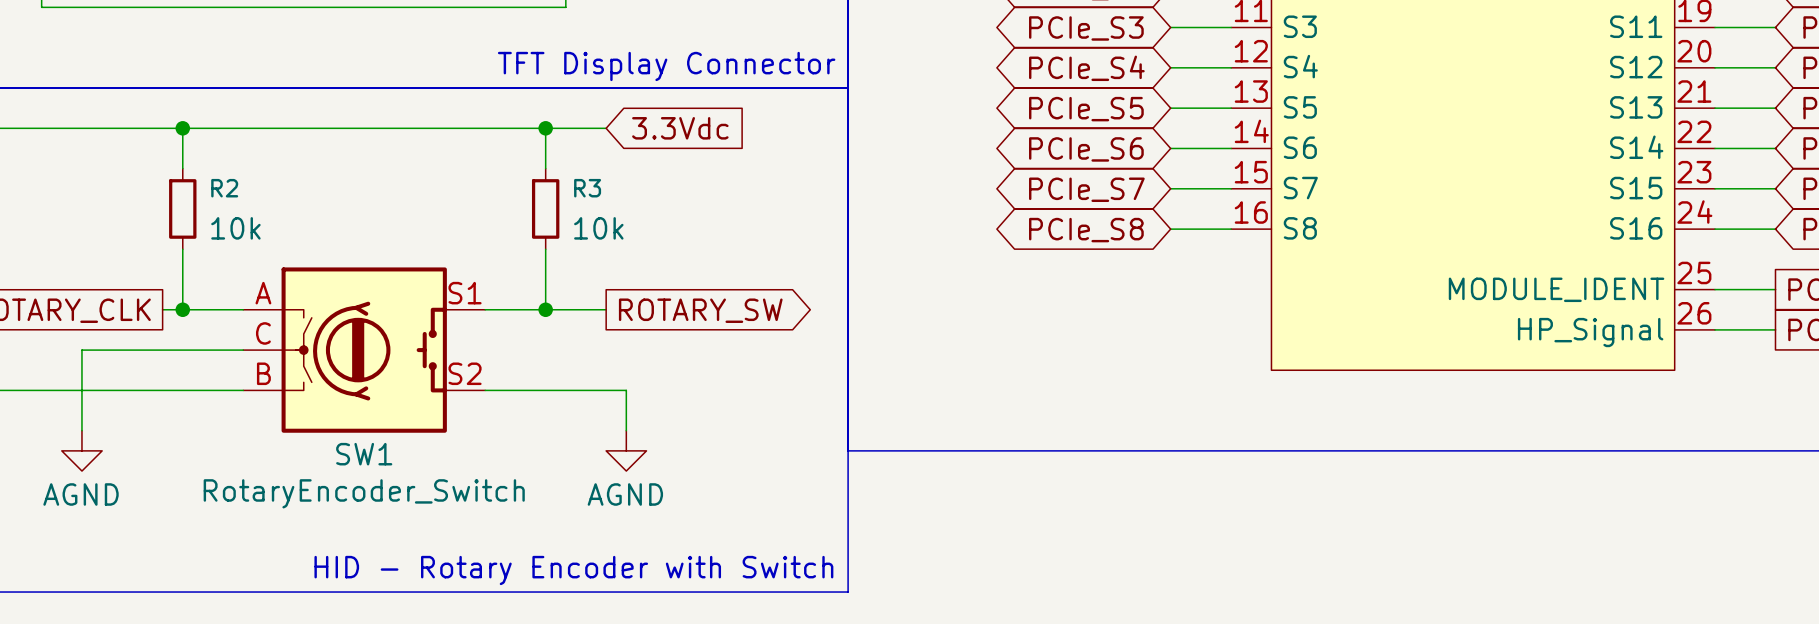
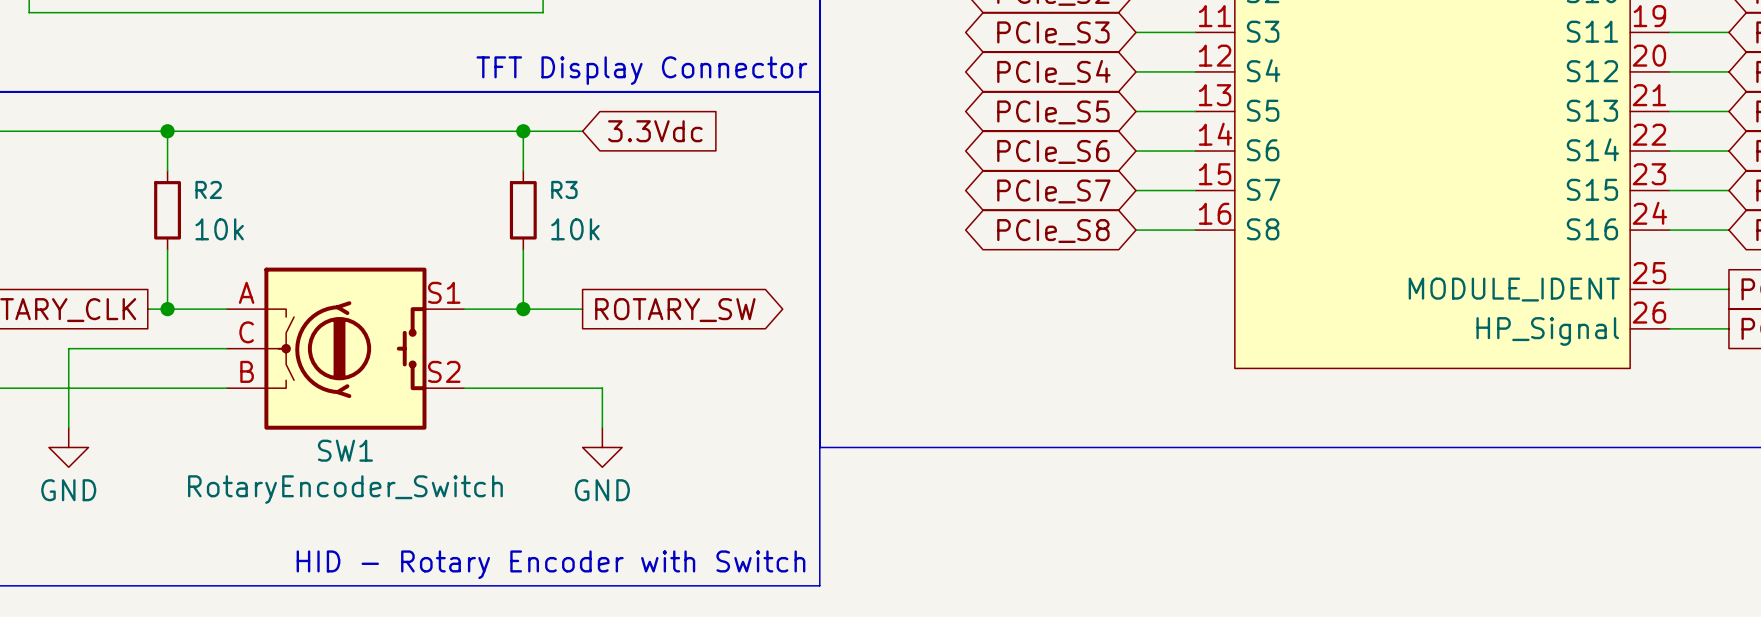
power symbol: AGND (81, 450) -> GND (68, 447)
power symbol: AGND (626, 450) -> GND (602, 447)

